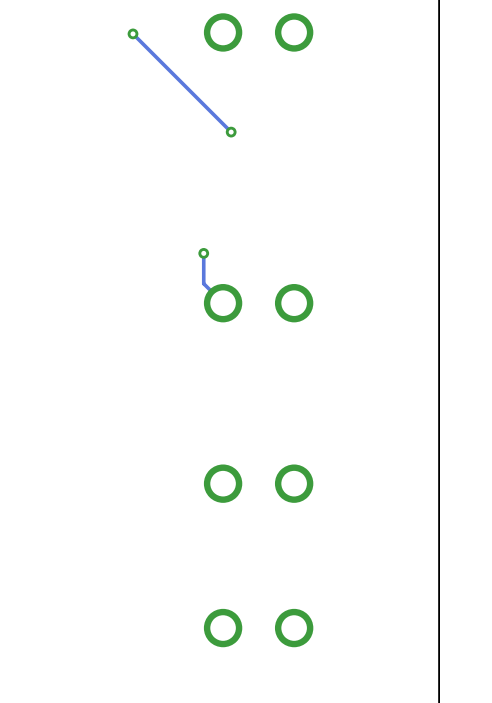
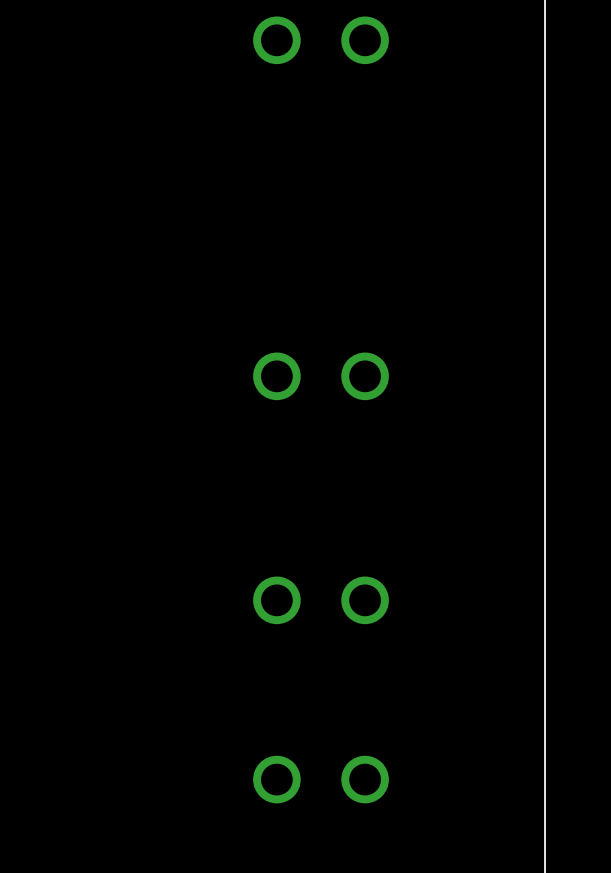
track: (132, 33) (231, 132) -> none
via: (132, 33) -> none
via: (231, 132) -> none
track: (203, 253) (203, 283) (223, 303) -> none
via: (203, 253) -> none

